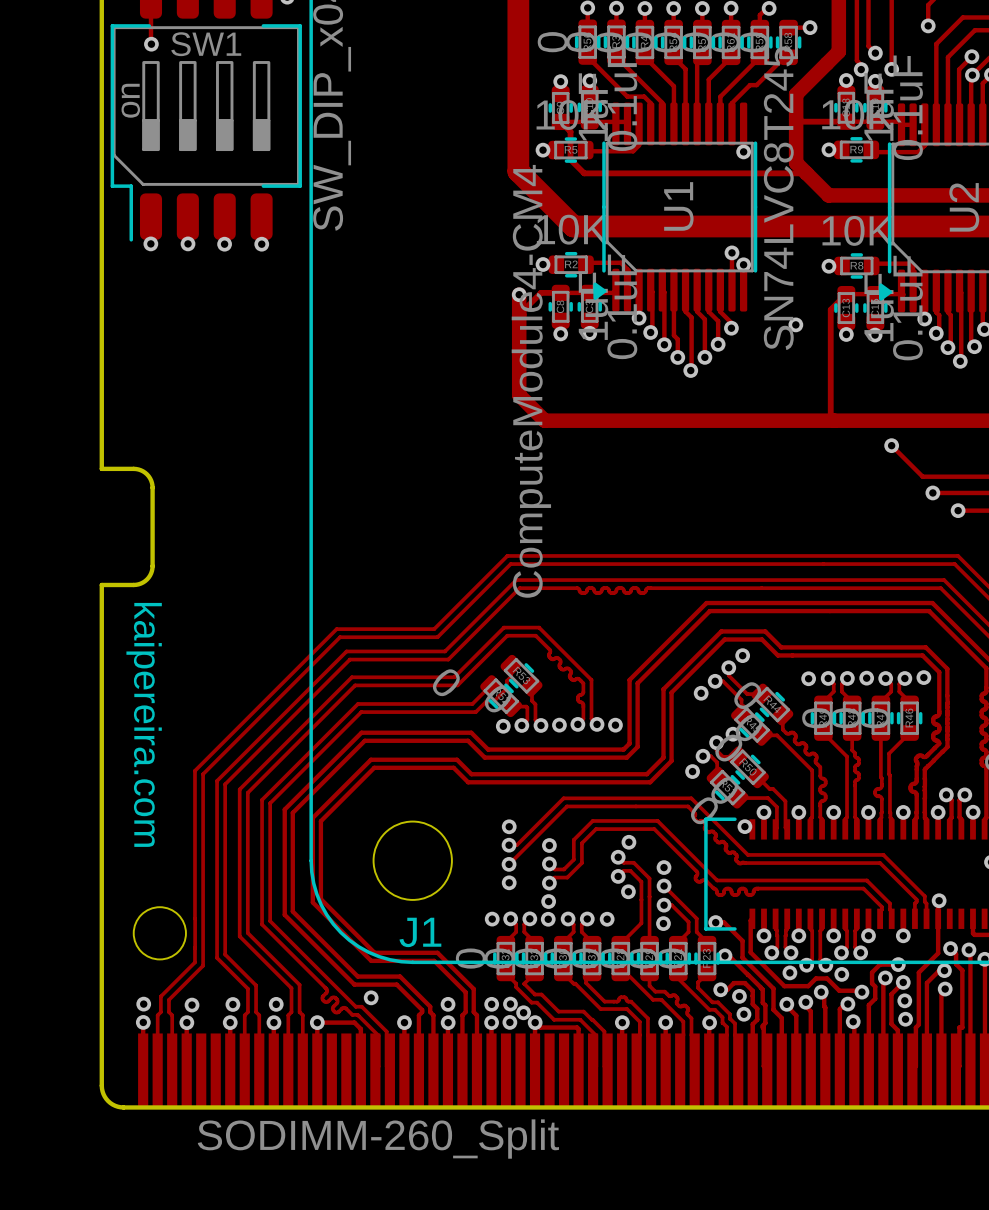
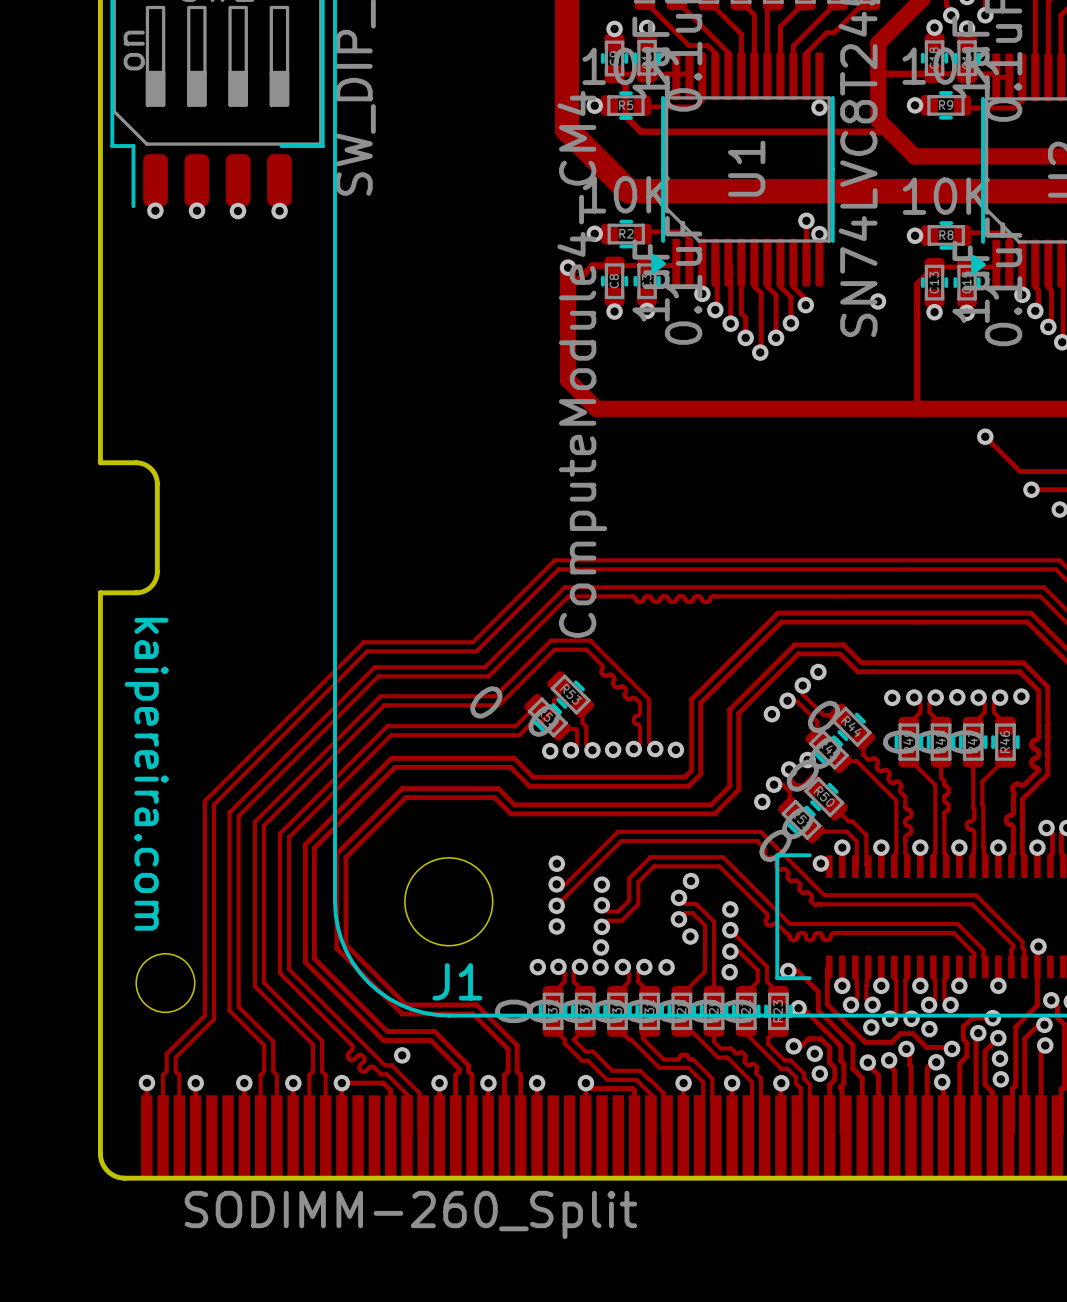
via: (143, 1004) -> none
via: (232, 1004) -> none
via: (276, 1004) -> none
via: (448, 1004) -> none
via: (491, 1004) -> none
via: (510, 1004) -> none
via: (192, 1005) -> none
via: (523, 1012) -> none
via: (509, 1022) -> none

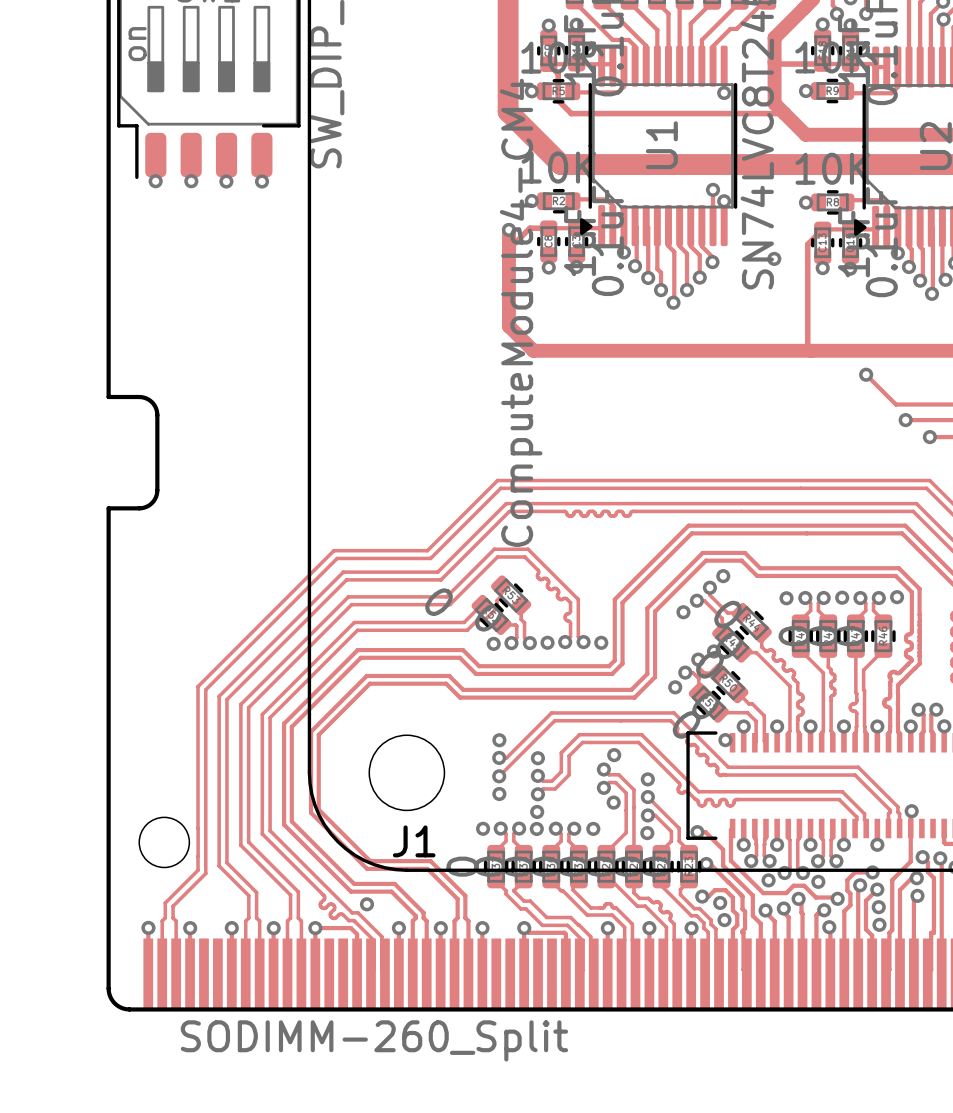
text: kaipereira.com (146, 774) -> none

